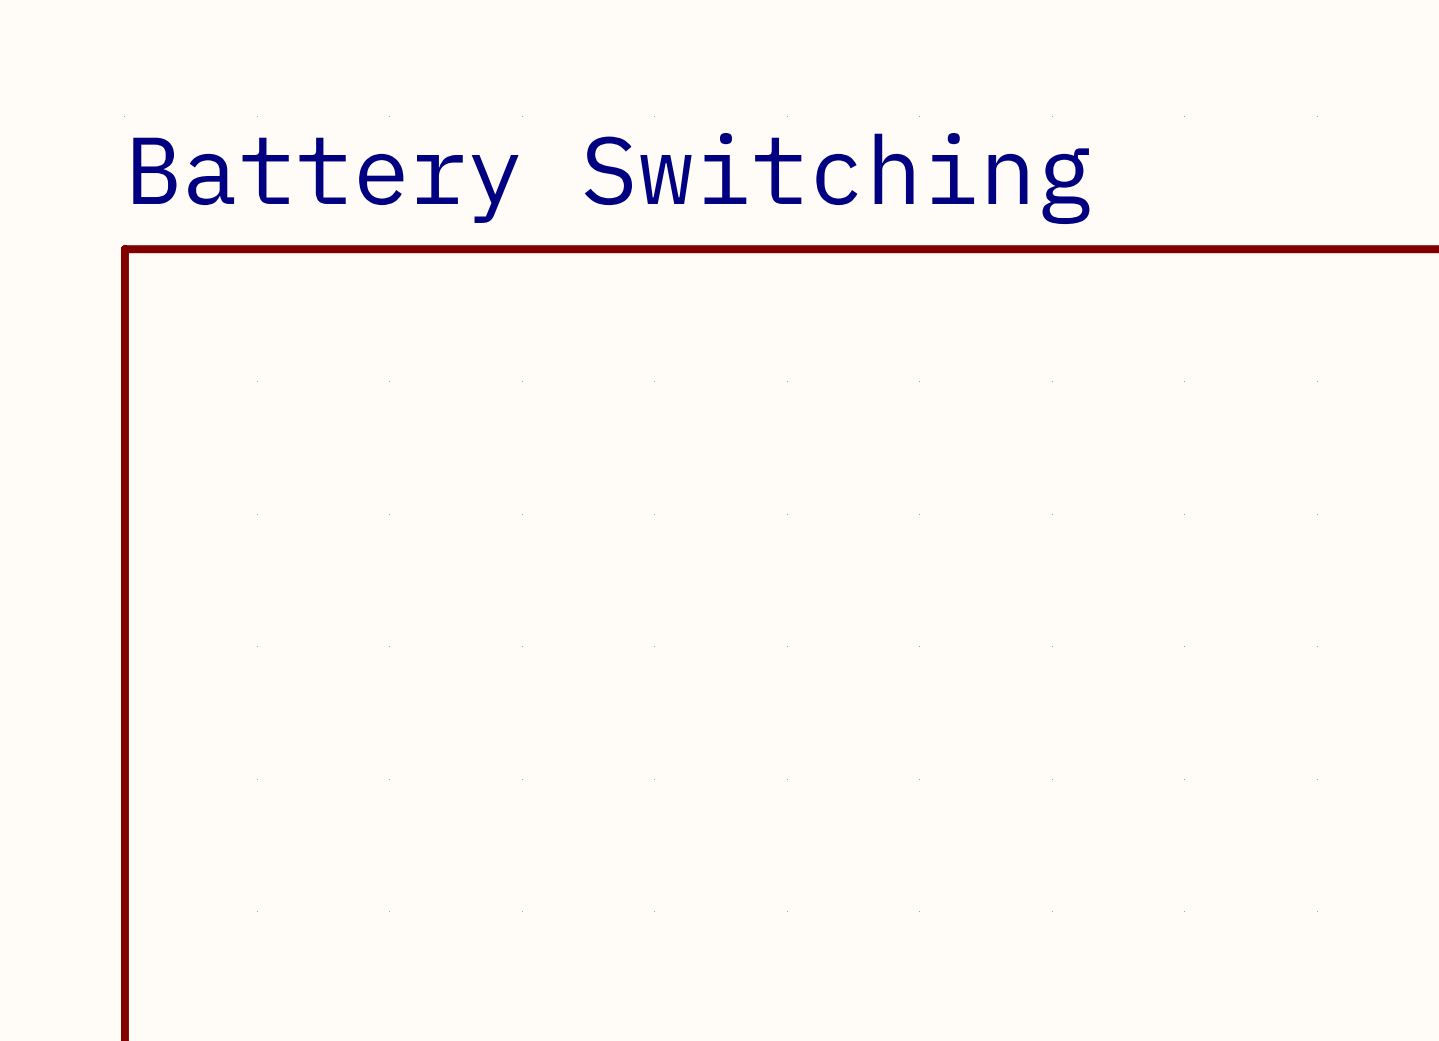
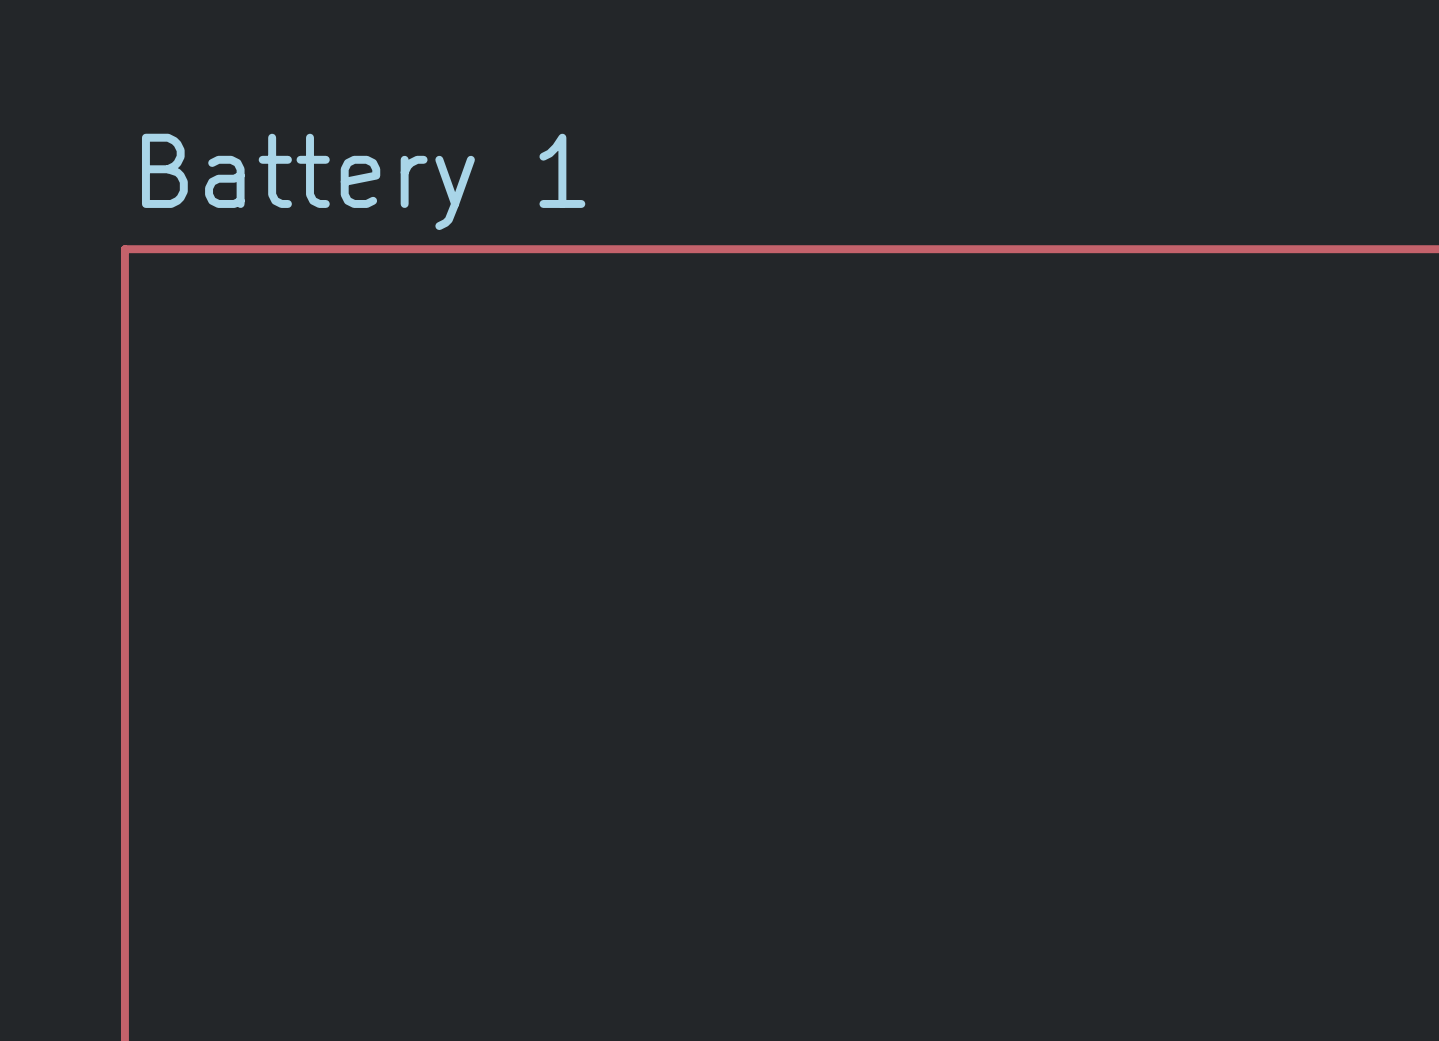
sheet Battery Switching name: Battery Switching (611, 178) -> Battery 1 (363, 181)

